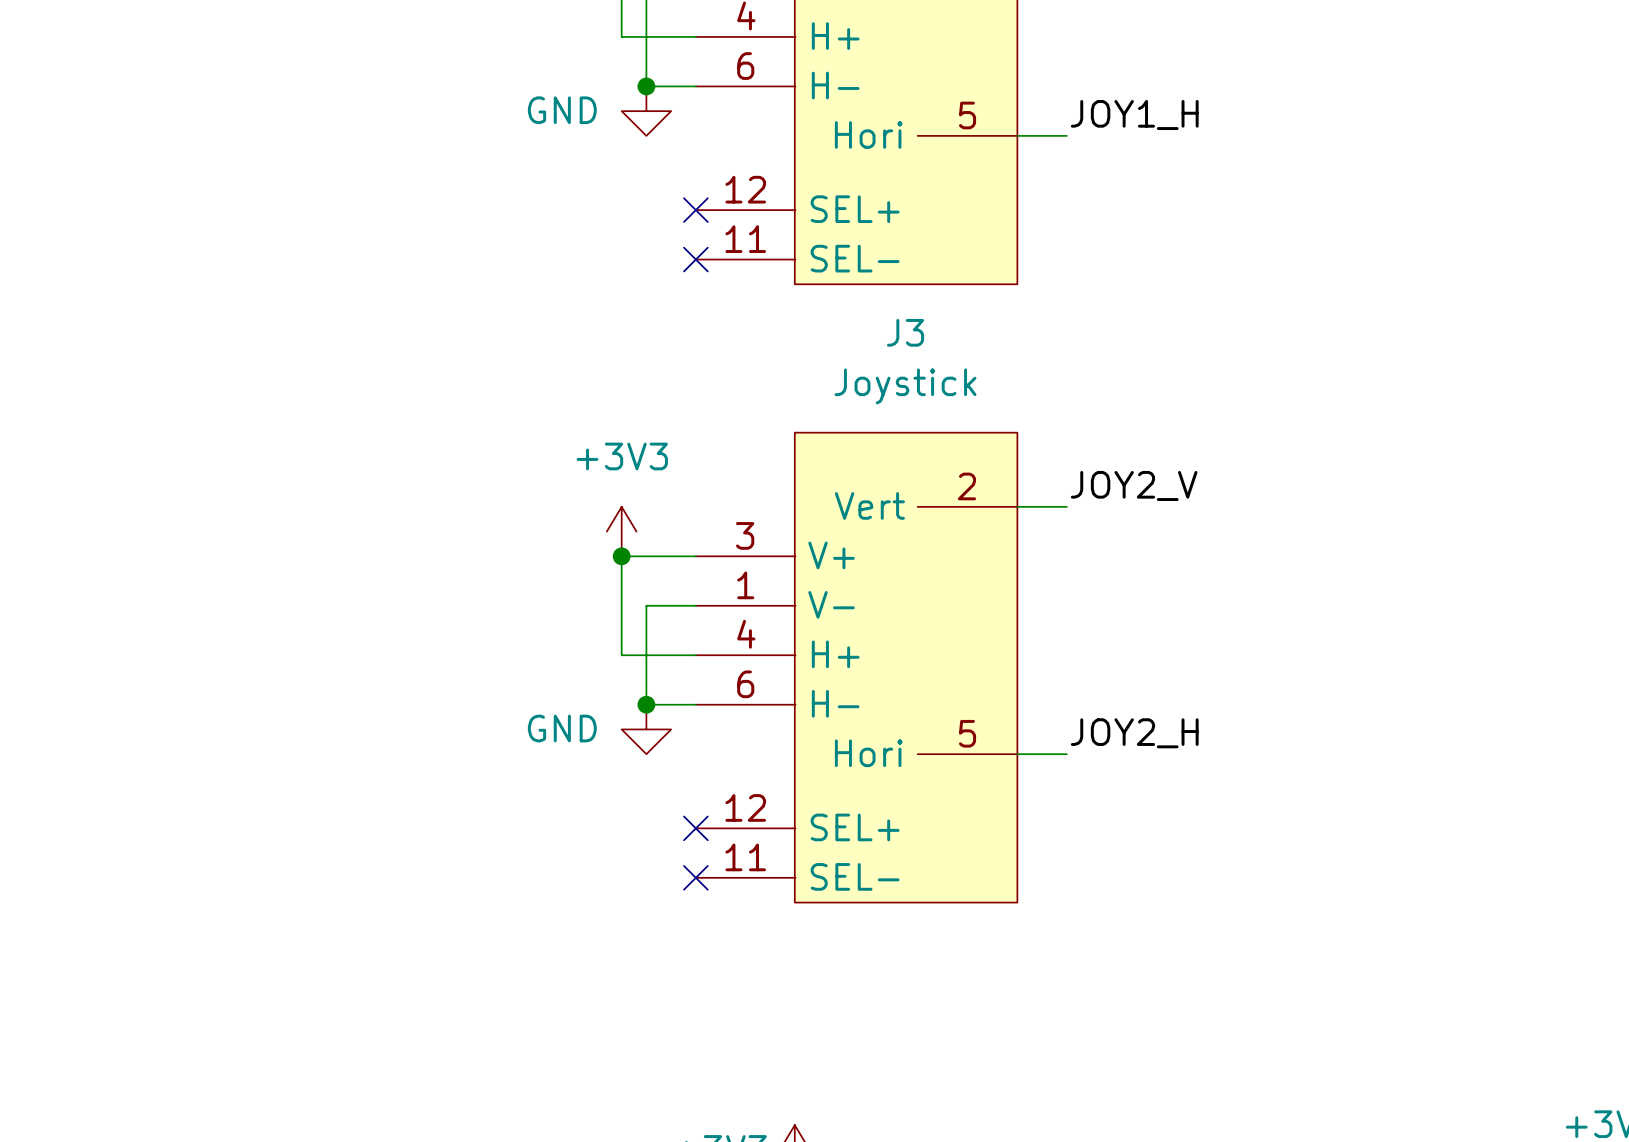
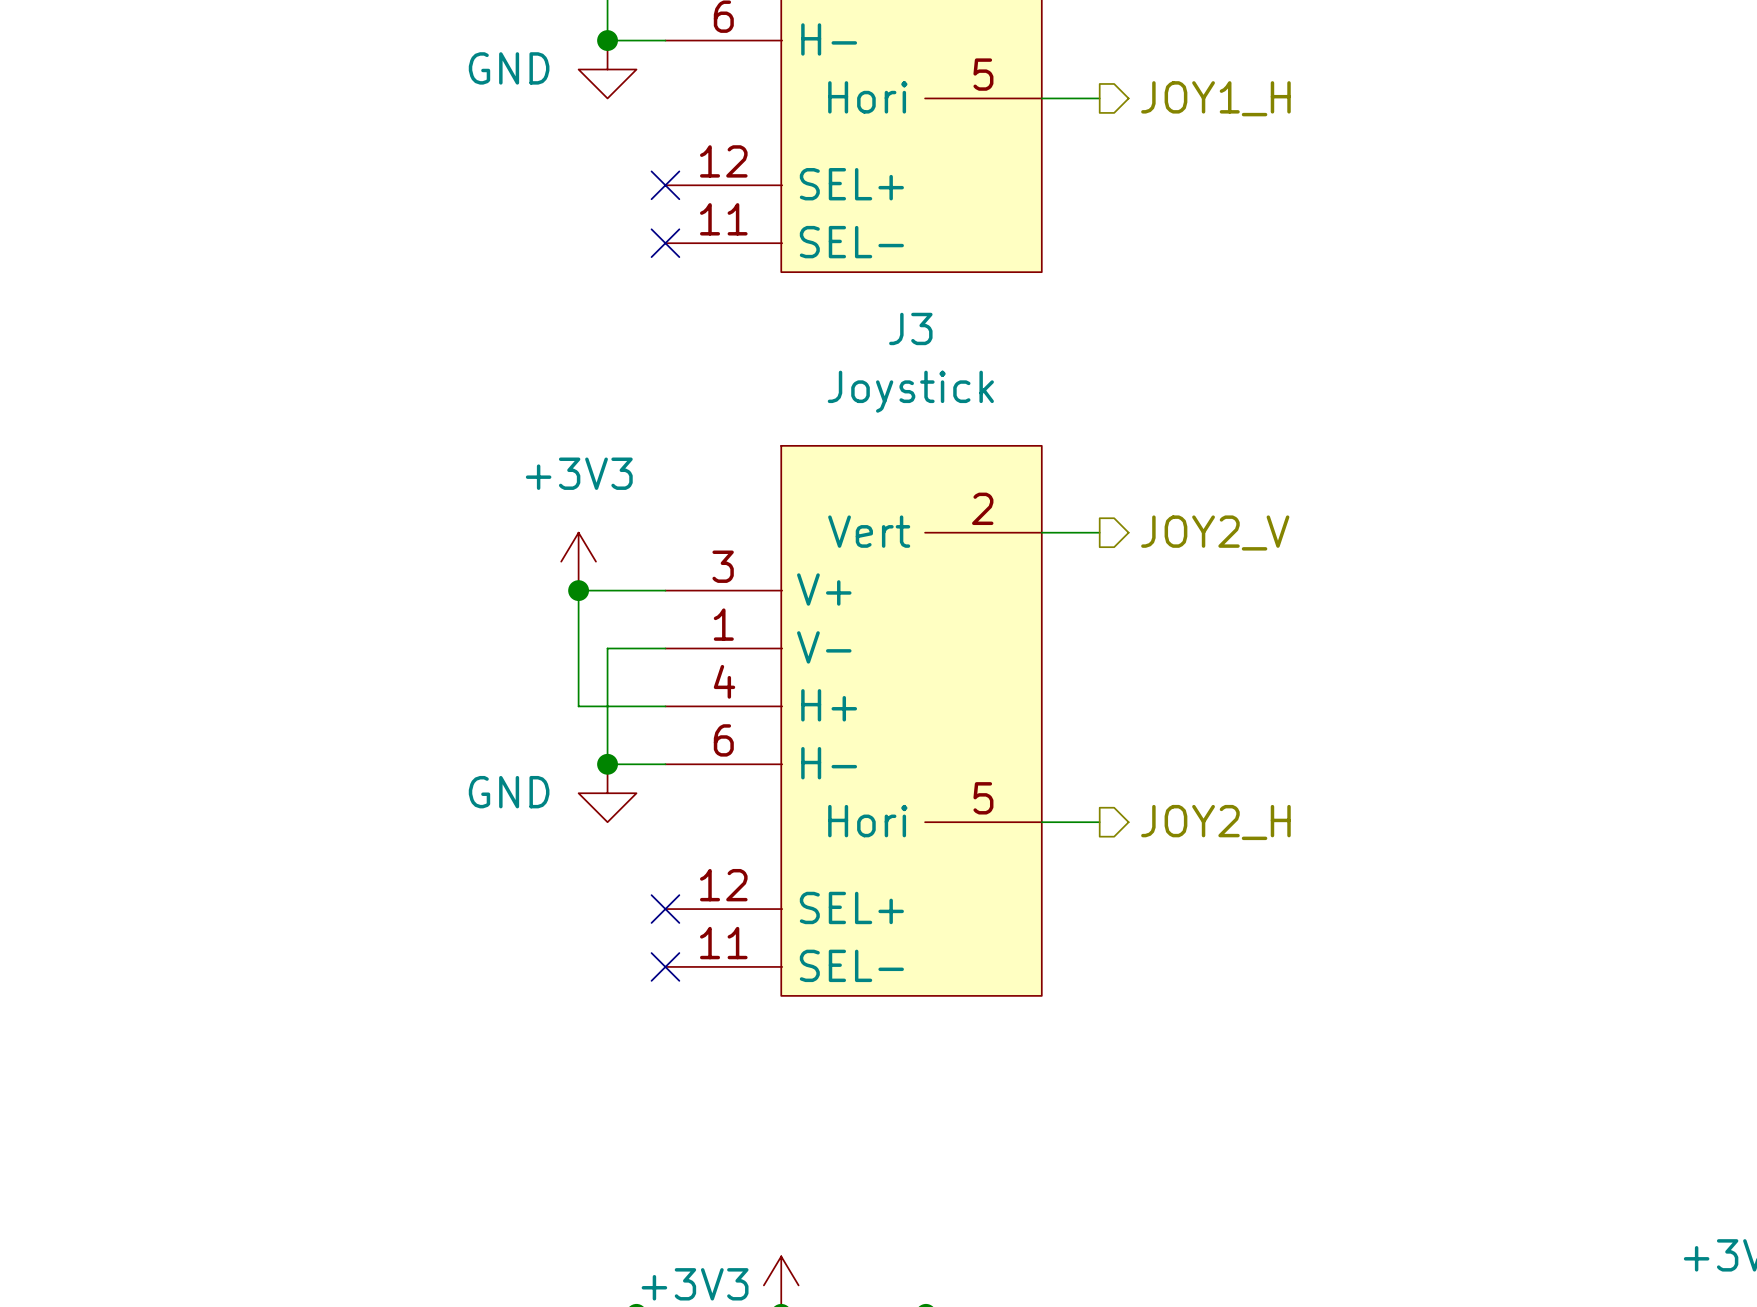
label: JOY1_H (1134, 115) -> none
hierarchical label: none -> JOY1_H (1215, 98)
label: JOY2_V (1134, 485) -> none
hierarchical label: none -> JOY2_V (1215, 532)
label: JOY2_H (1134, 733) -> none
hierarchical label: none -> JOY2_H (1215, 822)

